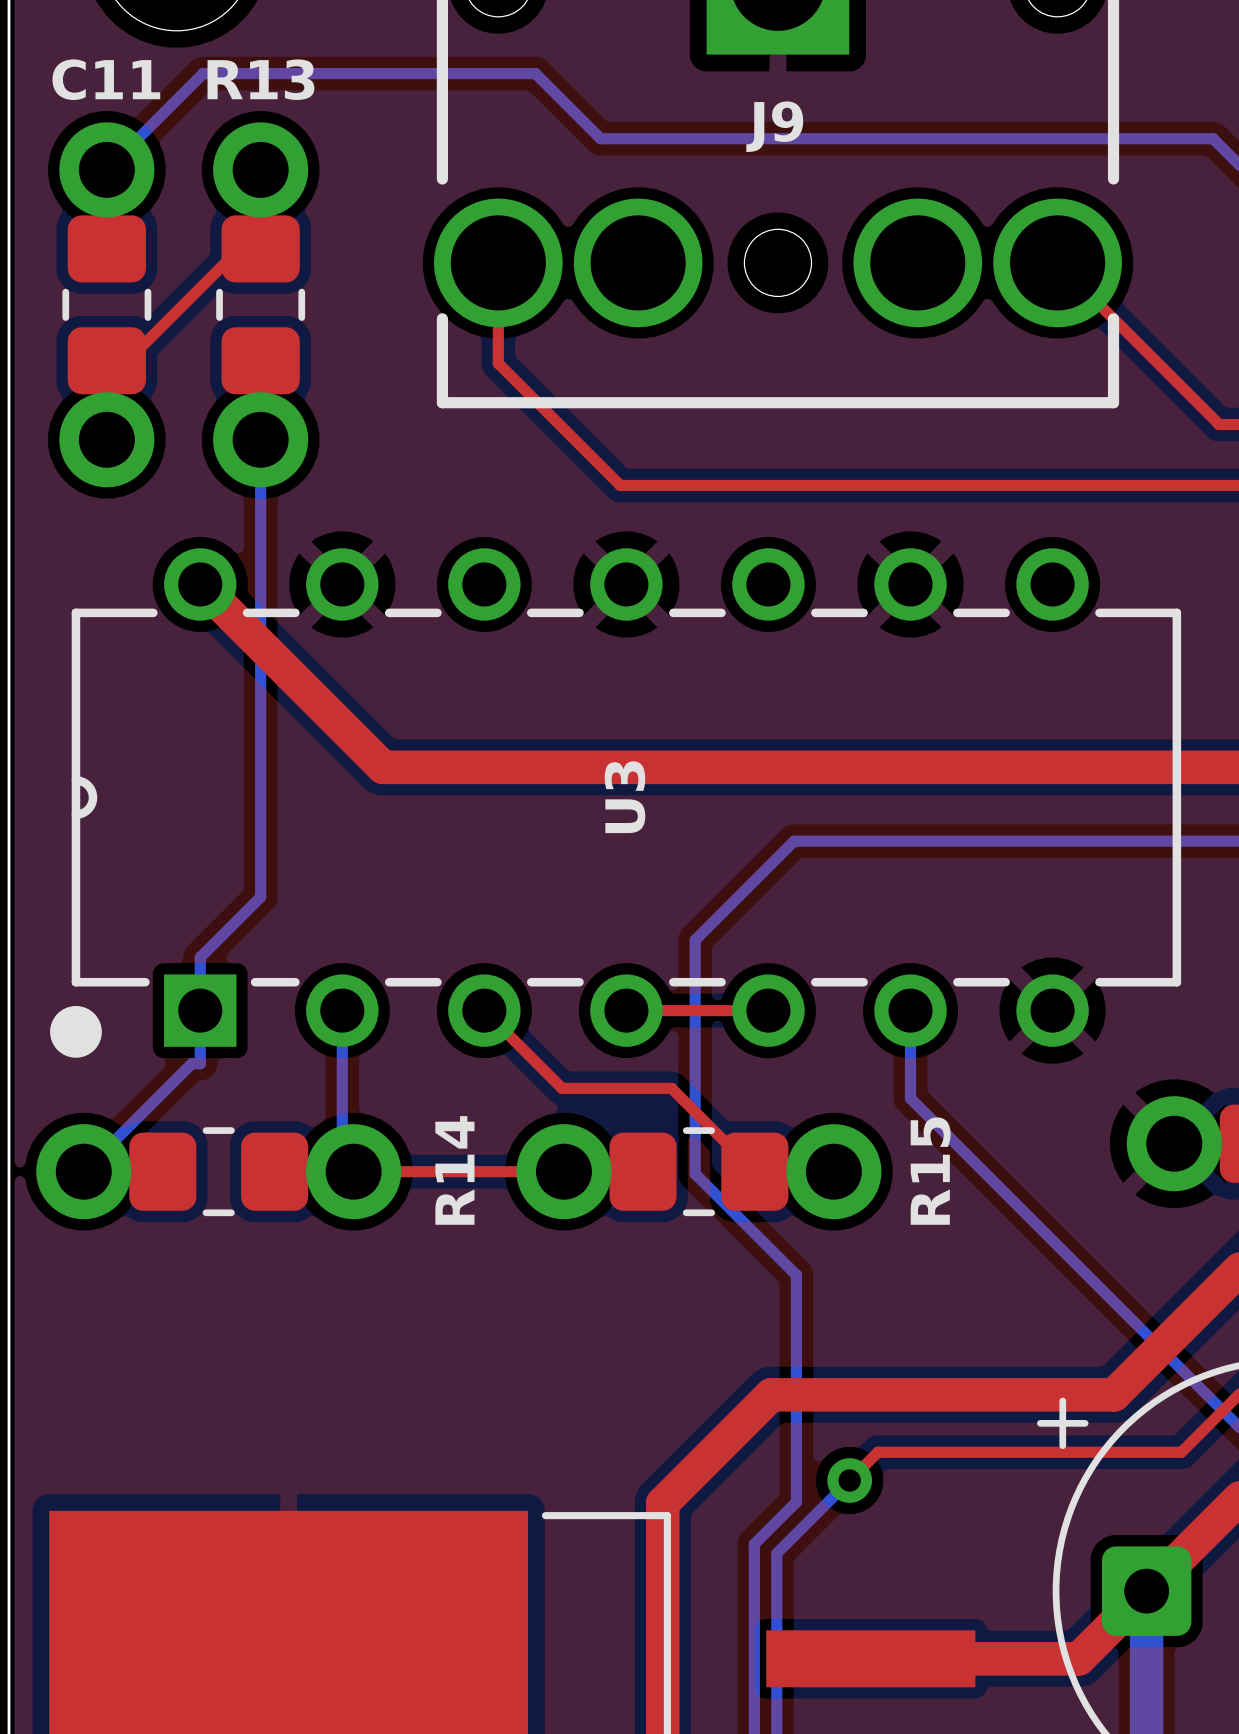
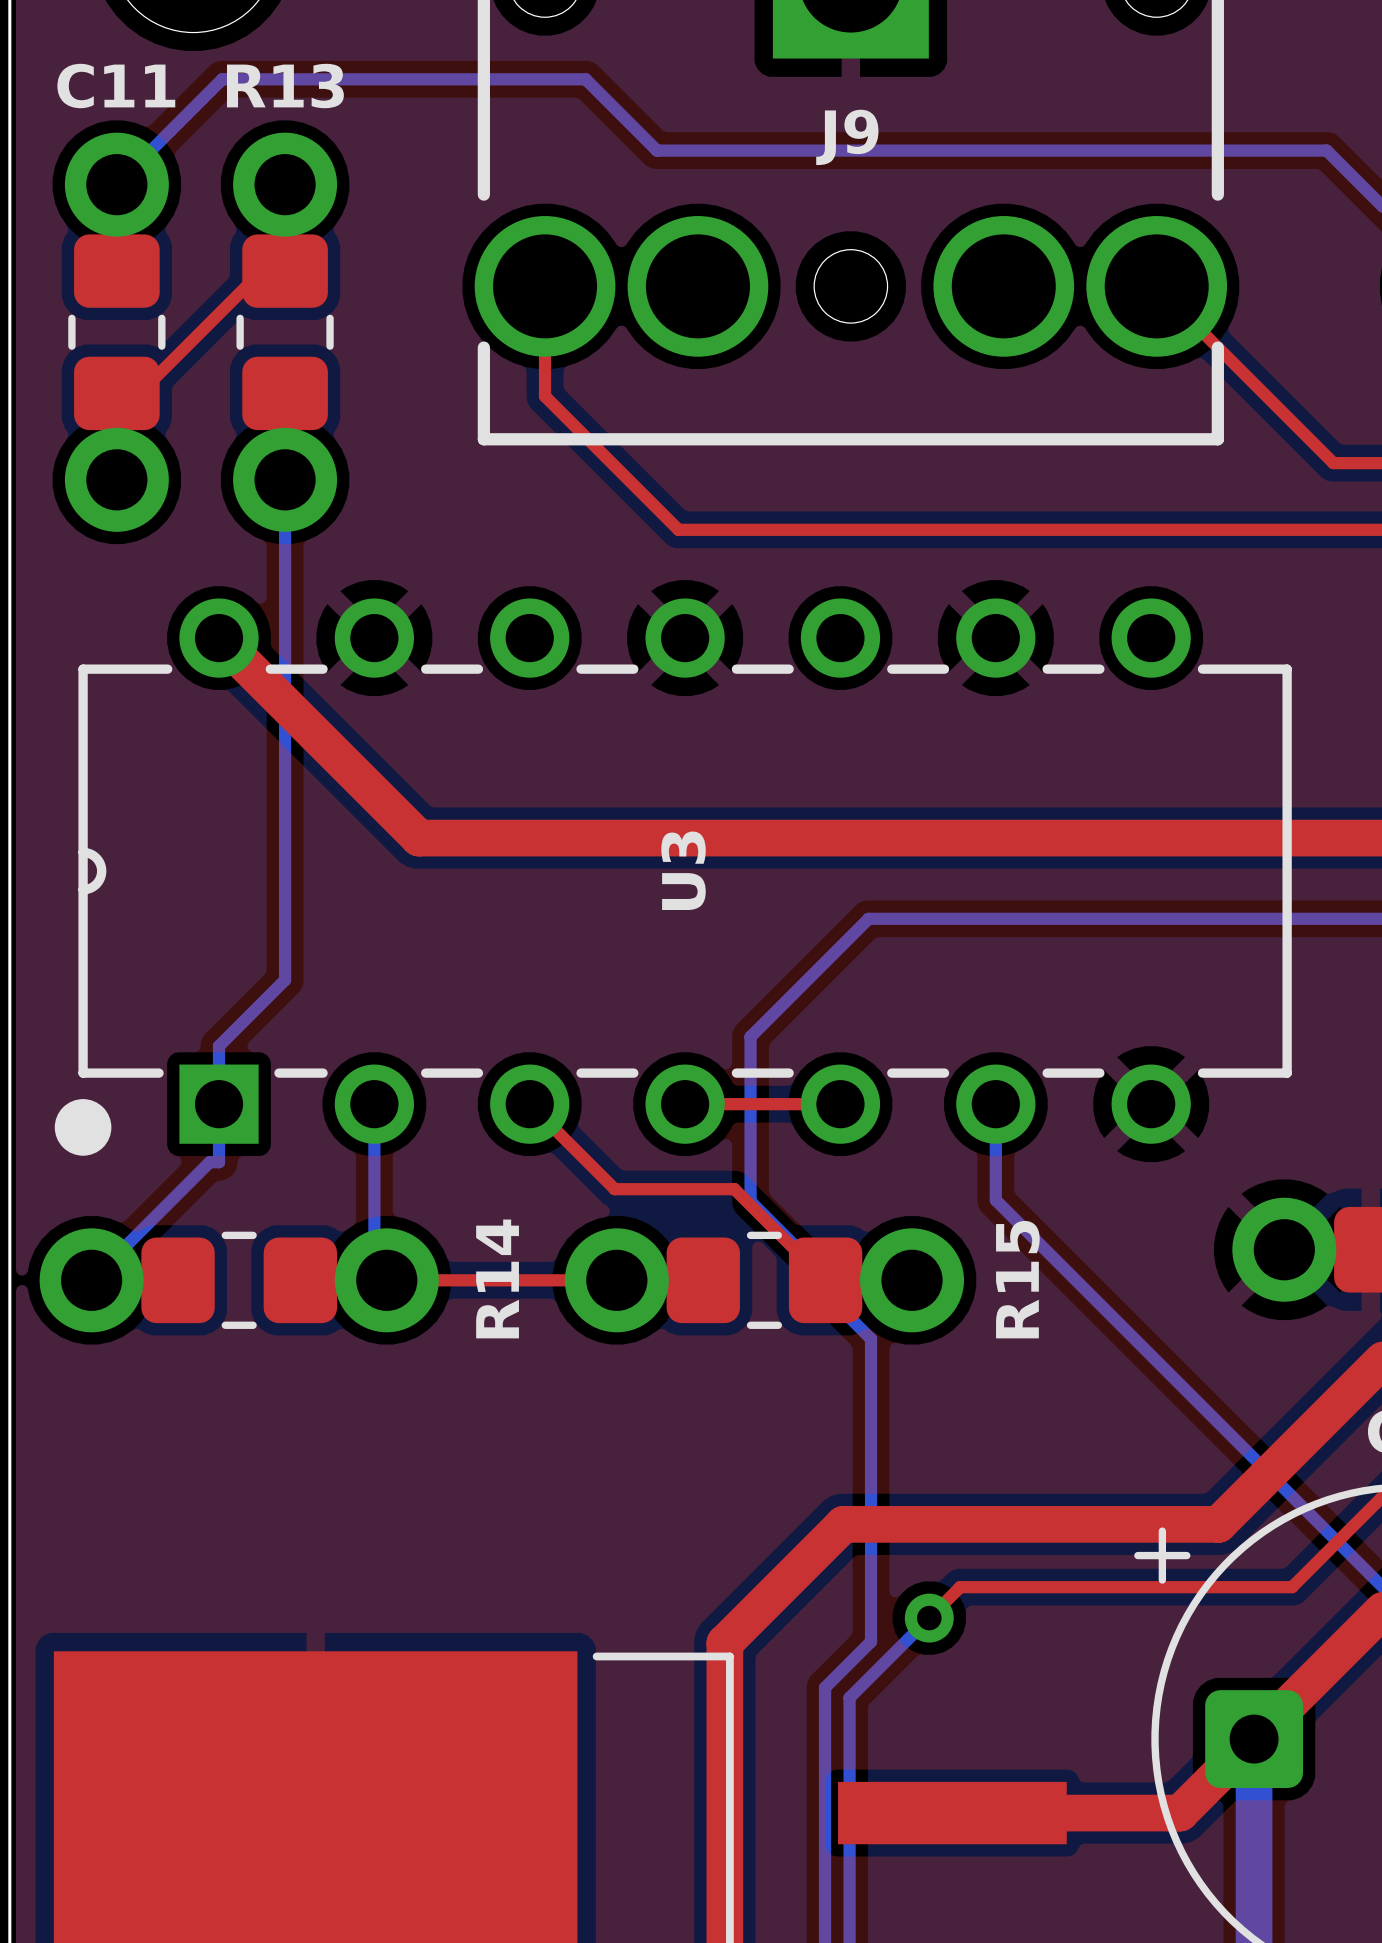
bottom track: (695, 940) (695, 1173) (796, 1275) -> (760, 1027) (750, 1036) (750, 1201) (841, 1292) (841, 1309) (871, 1338) (871, 1393)

